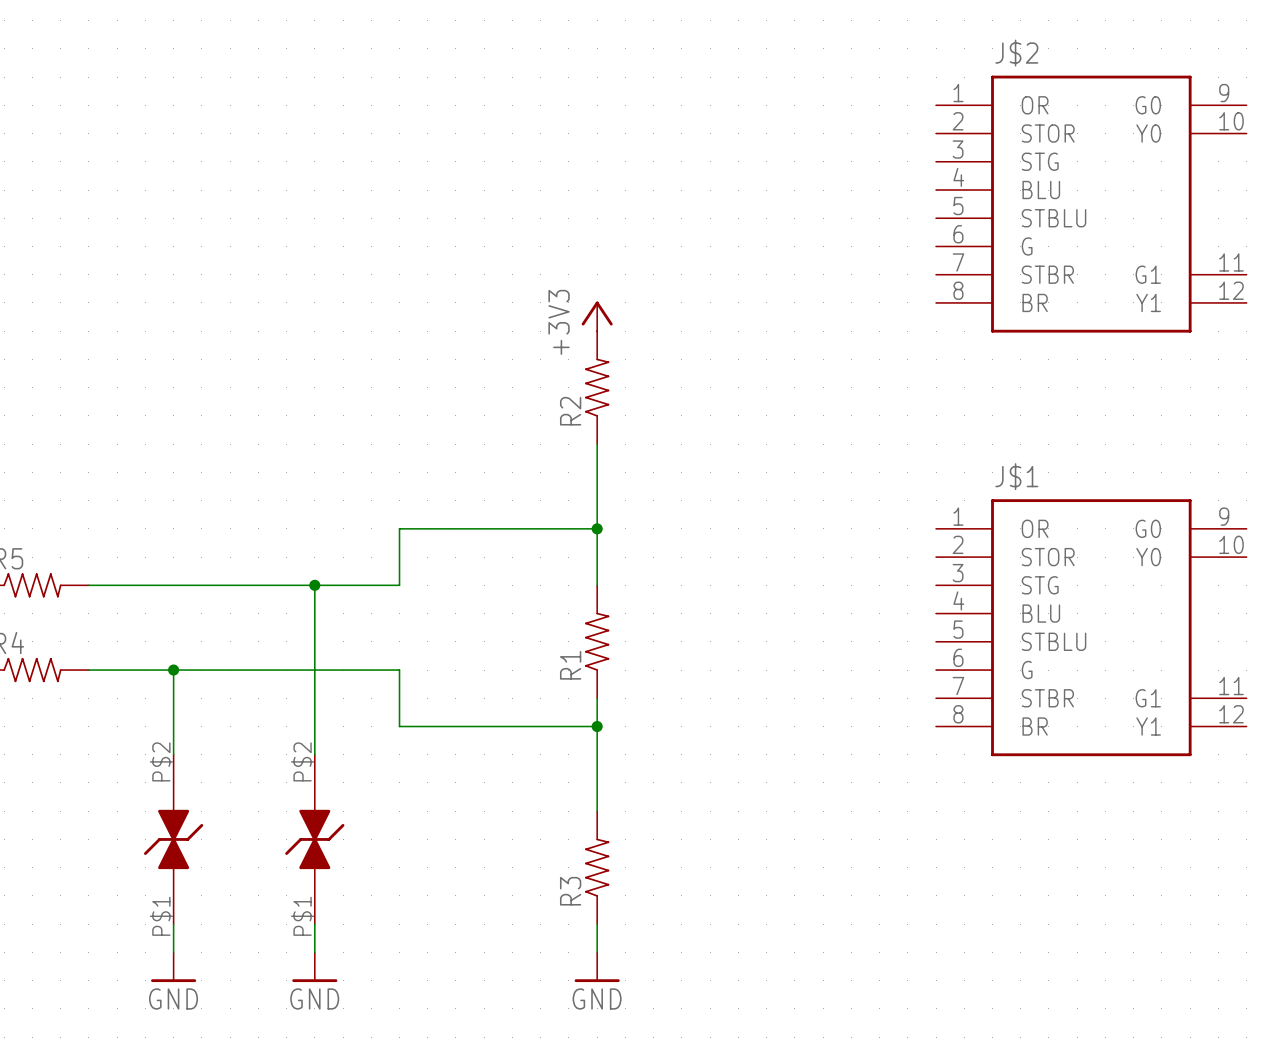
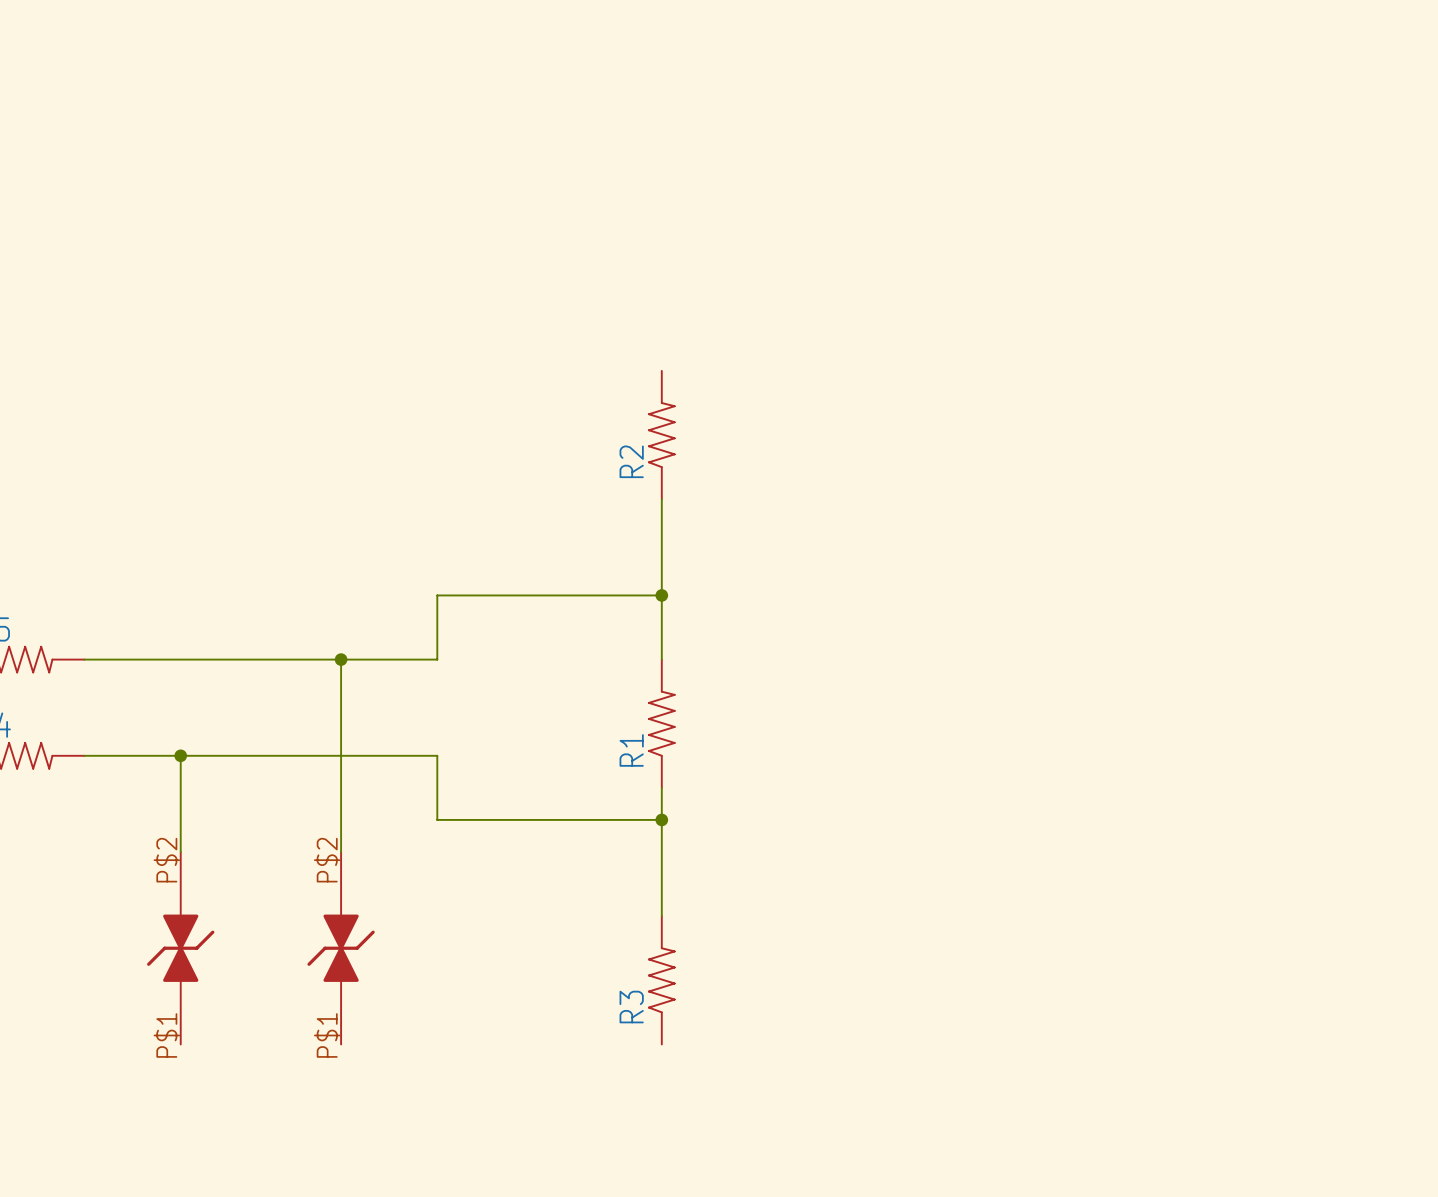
J$2: (1091, 204) -> none
power symbol: +3V3 (597, 316) -> none
J$1: (1091, 627) -> none
wire: (173, 924) (173, 952) -> none
wire: (314, 924) (314, 952) -> none
wire: (597, 924) (597, 952) -> none
power symbol: GND (173, 967) -> none
power symbol: GND (314, 967) -> none
power symbol: GND (597, 967) -> none

